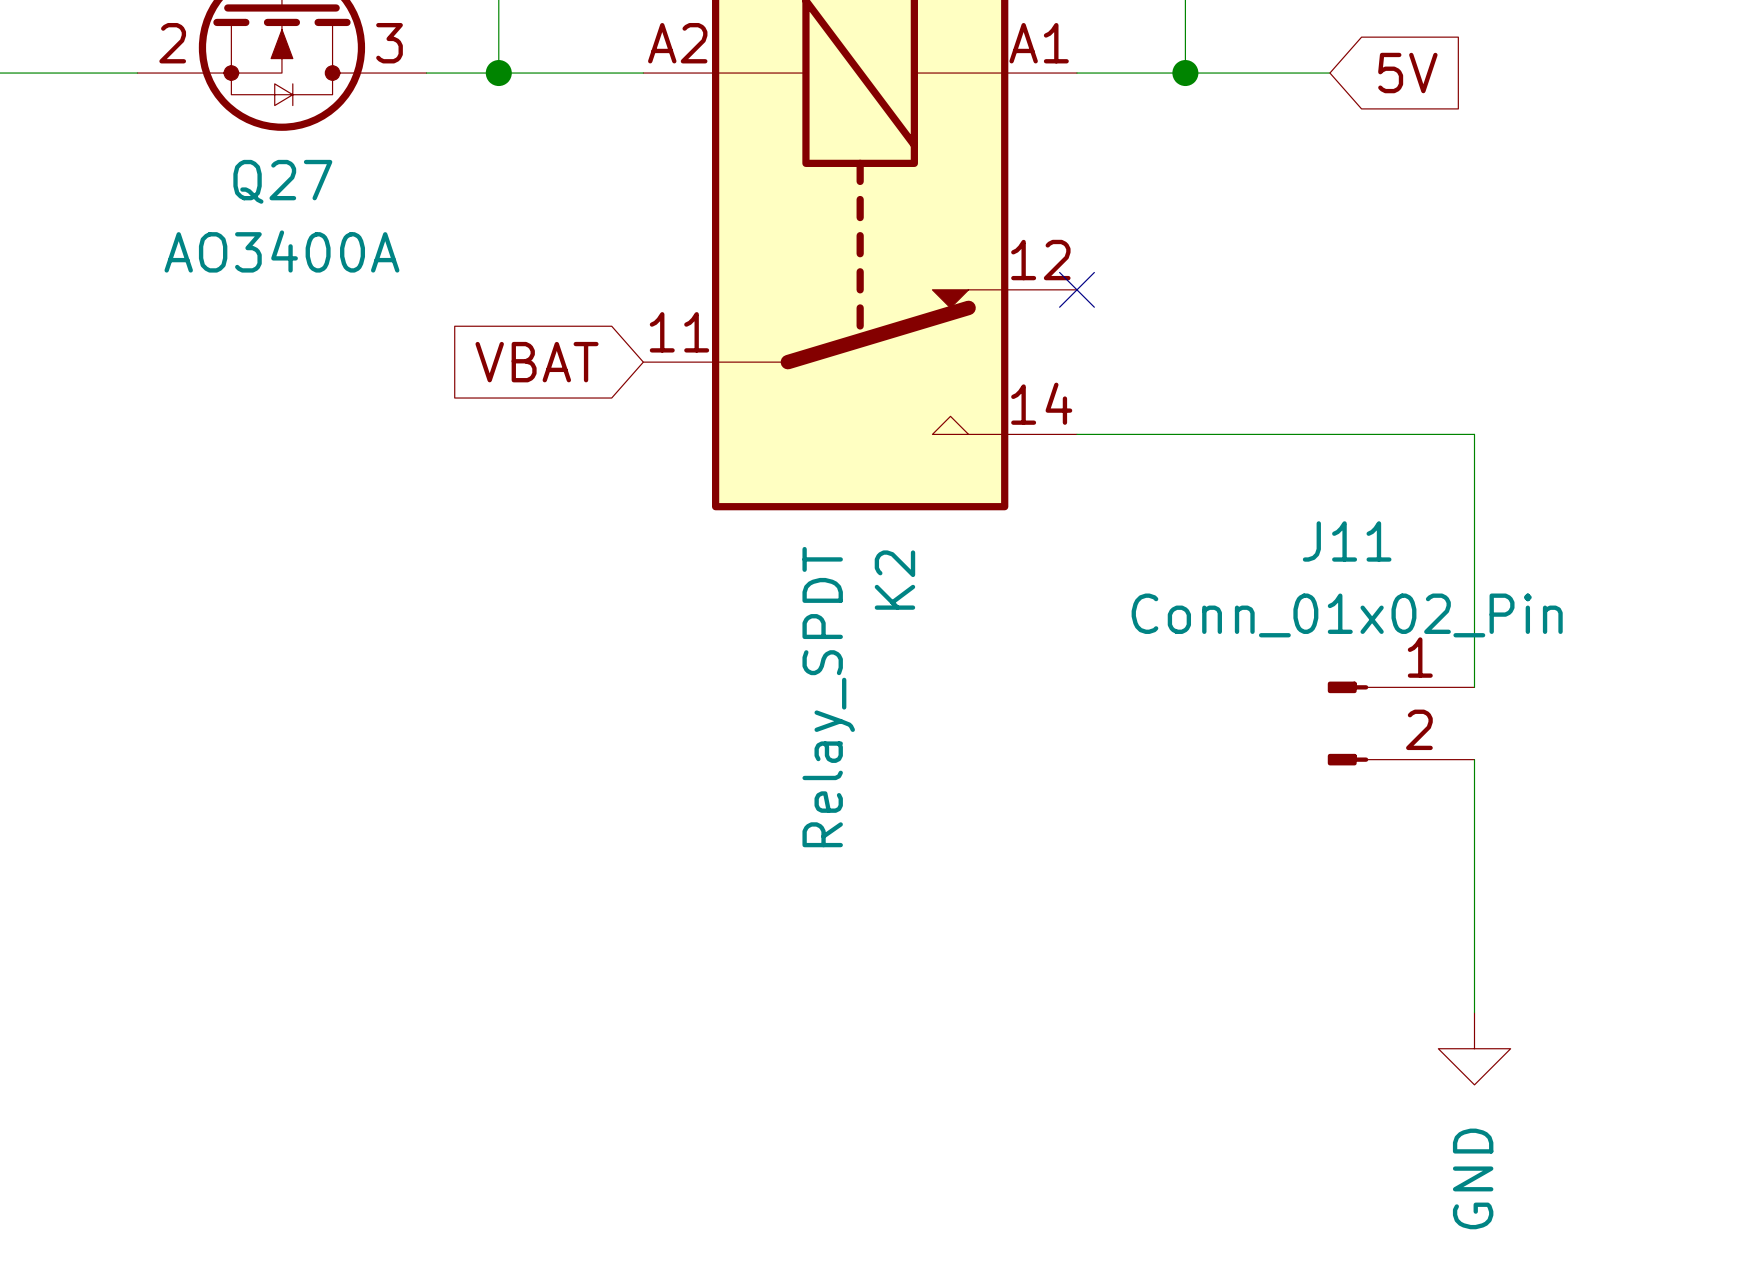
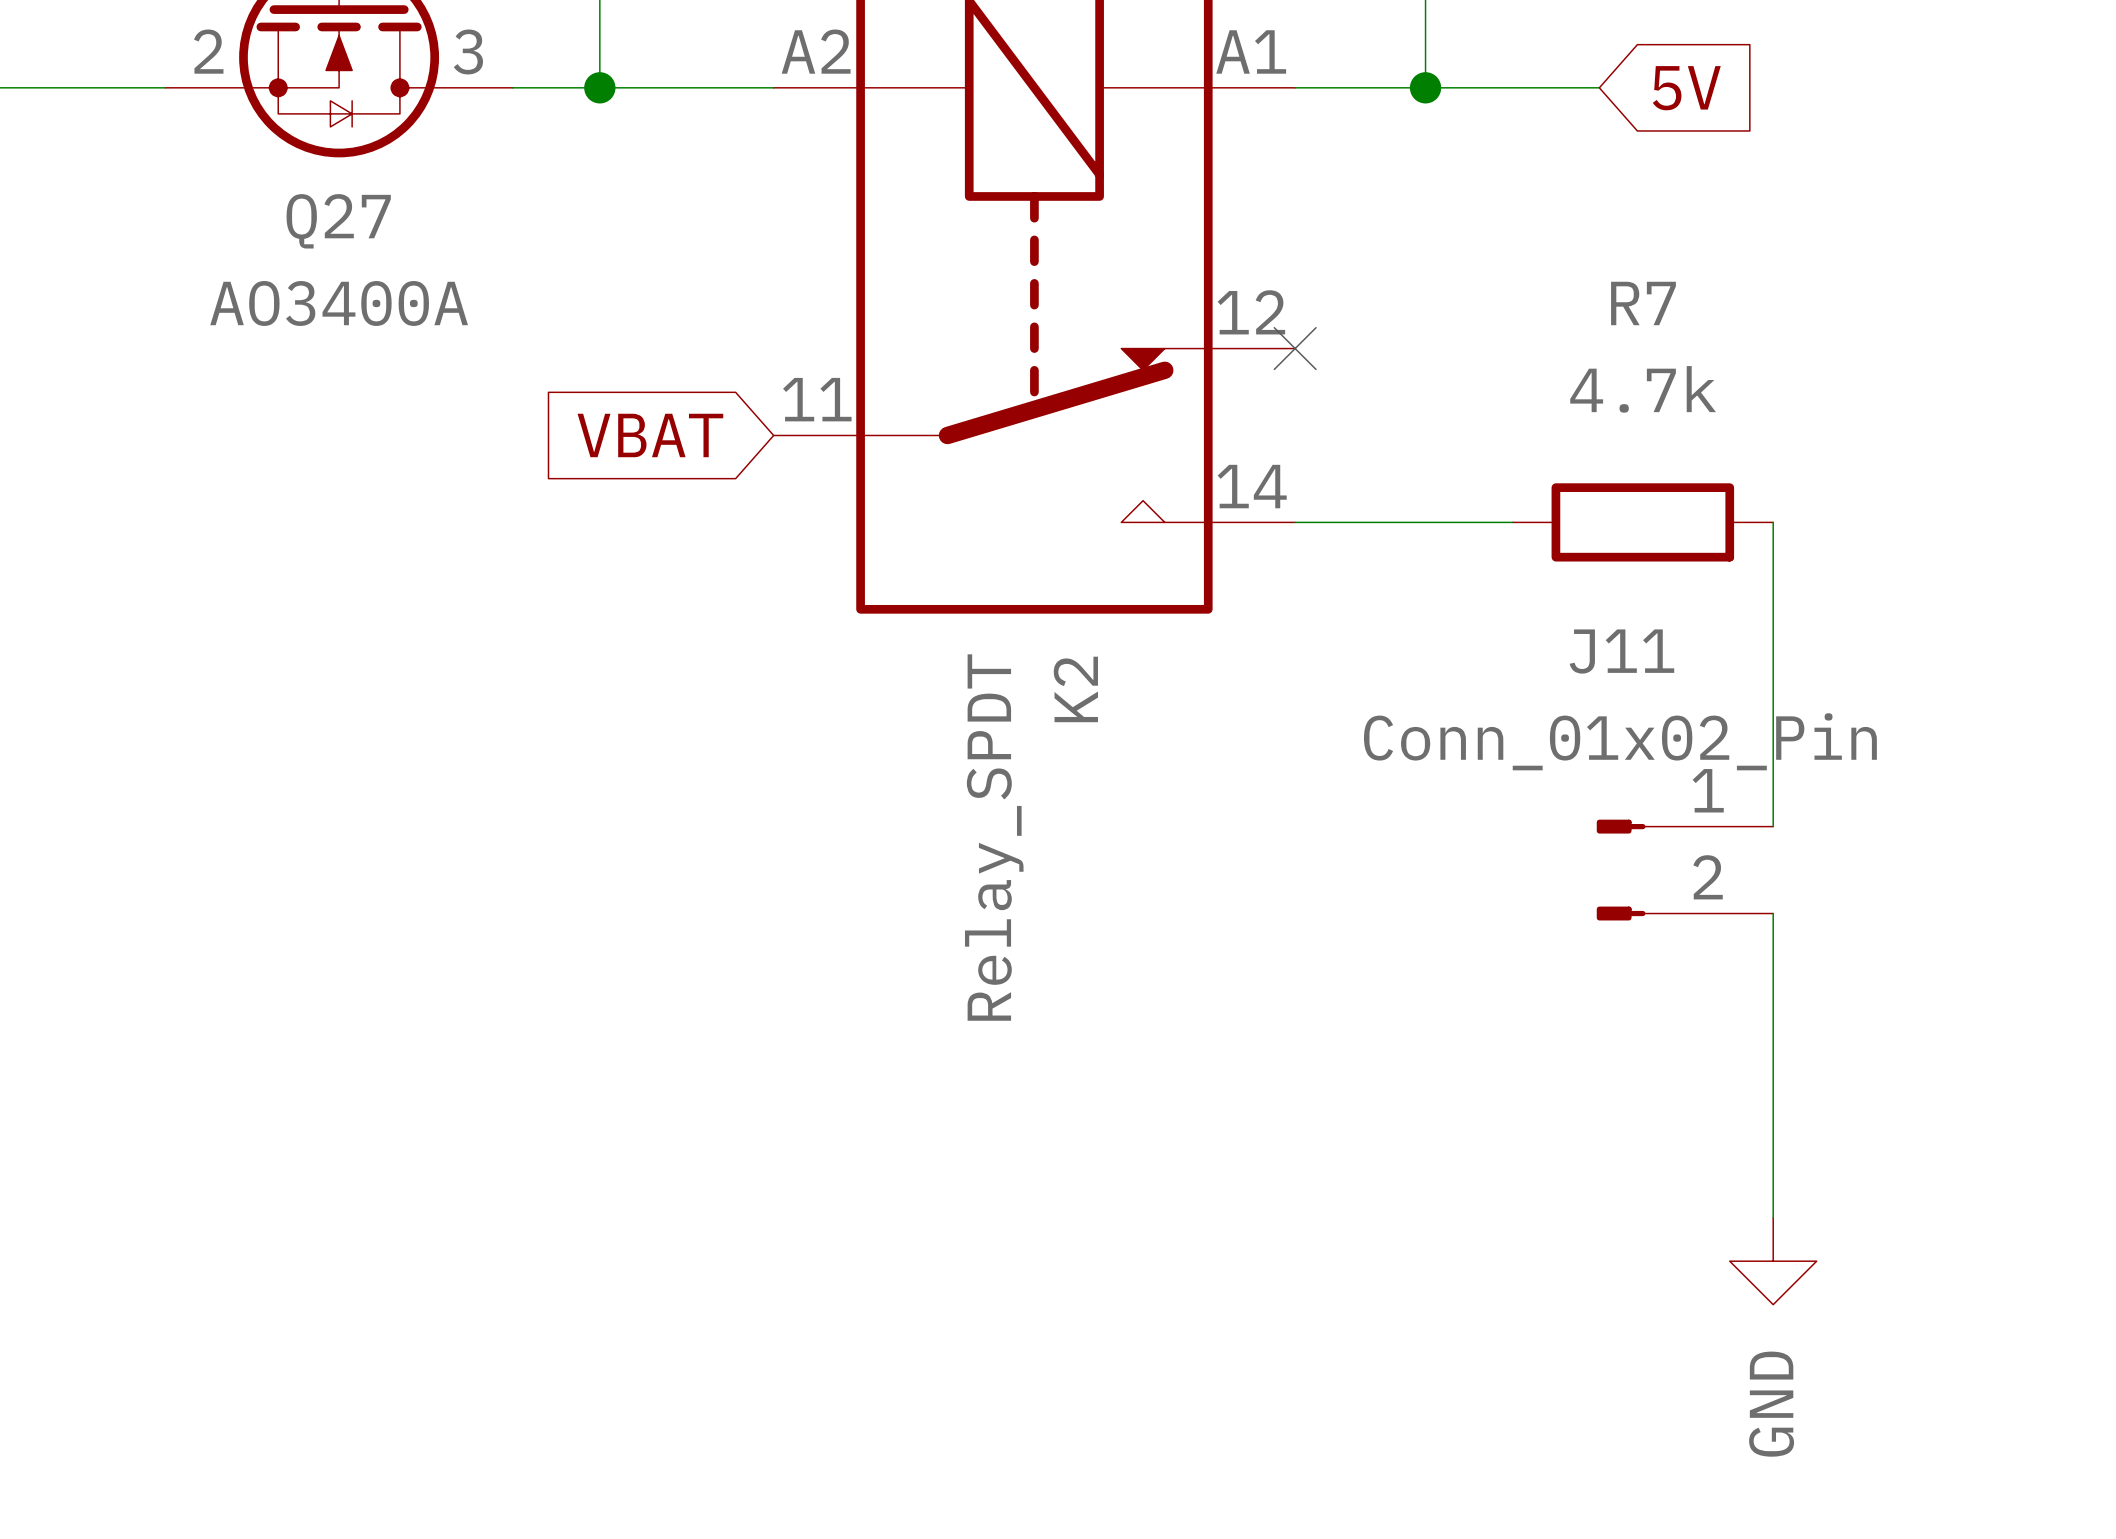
wire: (1257, 434) (1474, 434) -> none
R7: none -> 4.7k (1642, 522)

